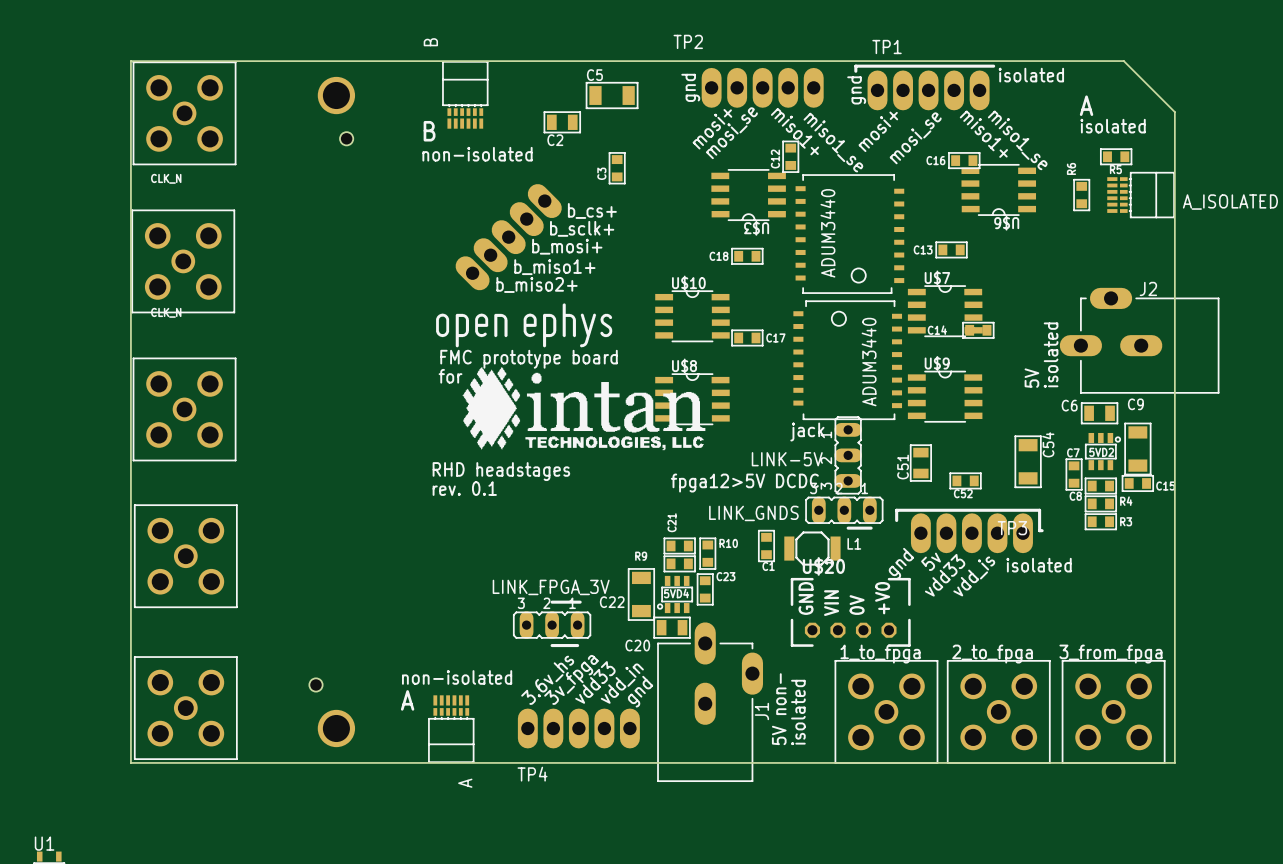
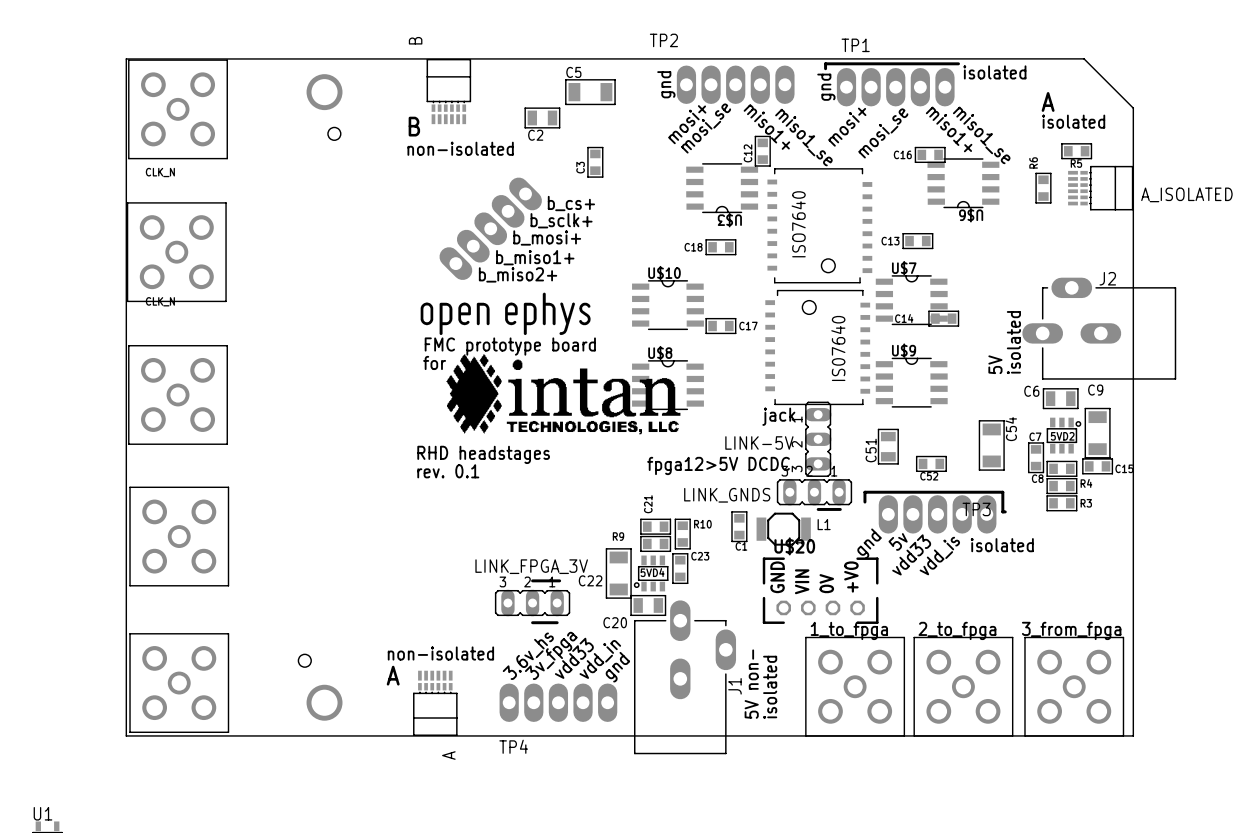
part value: ADUM3440 (827, 233) -> ISO7640 (798, 224)
part value: ADUM3440 (869, 362) -> IS07640 (838, 348)

